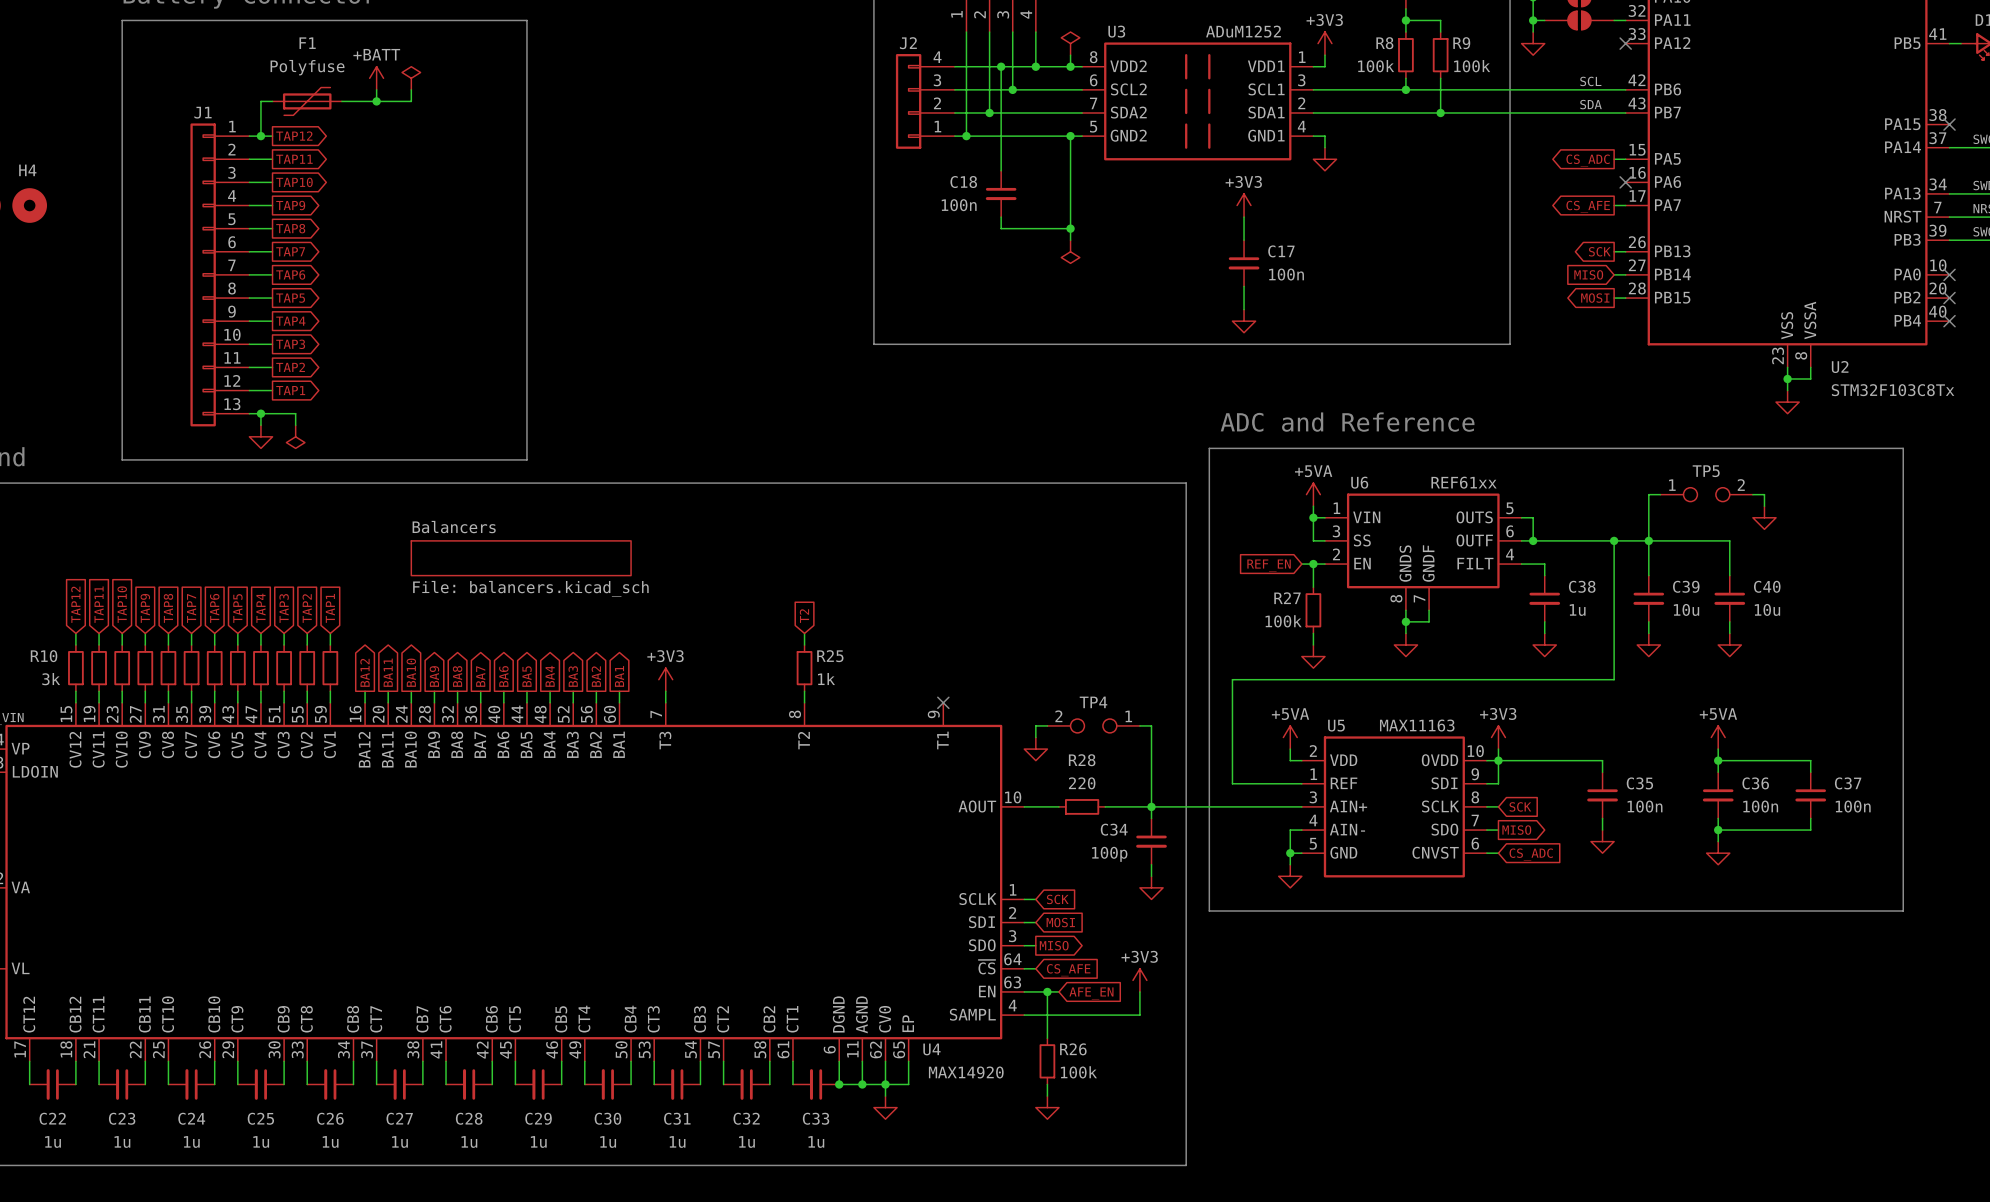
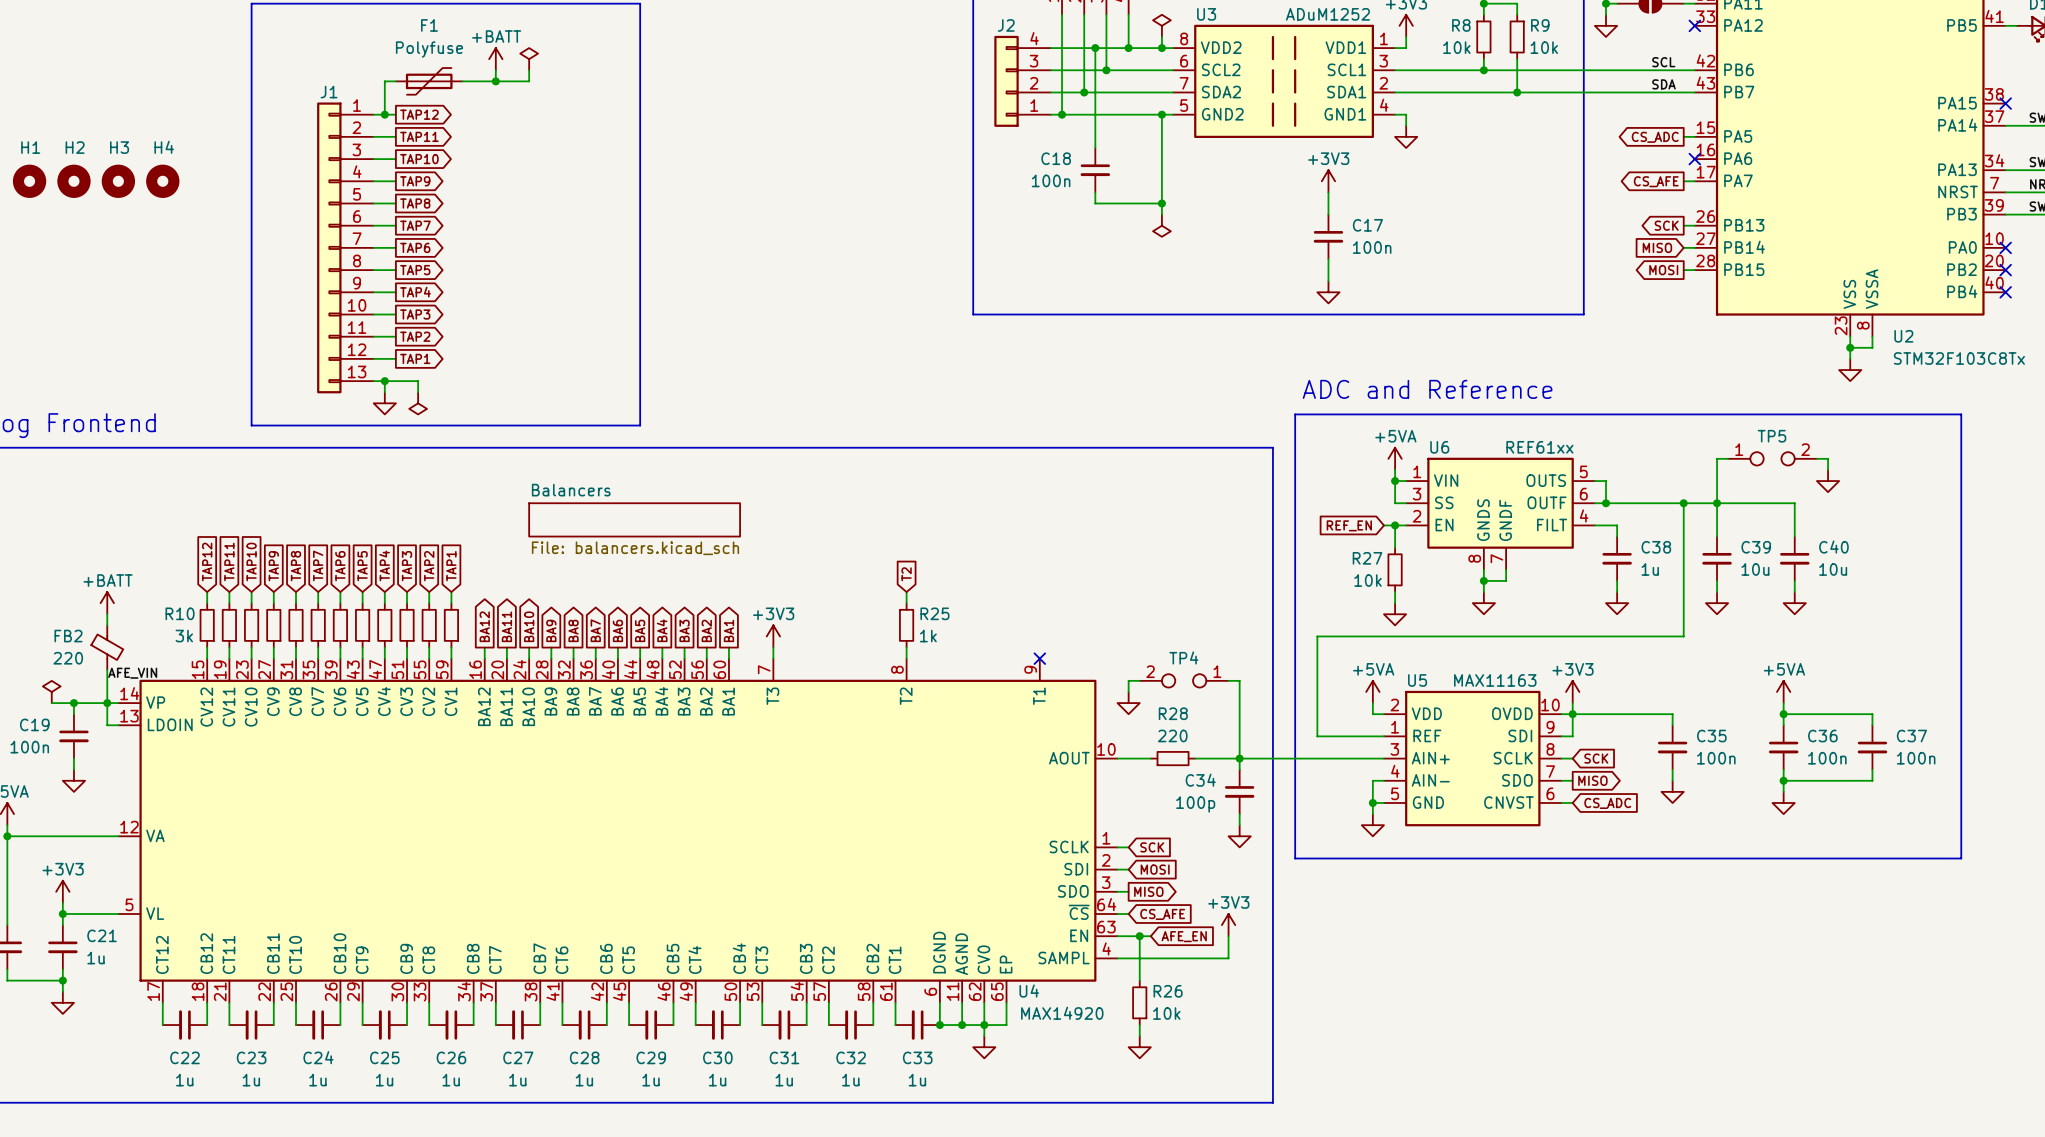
R8 value: 100k (1376, 66) -> 10k (1456, 47)
R9 value: 100k (1472, 66) -> 10k (1544, 47)
R27 value: 100k (1283, 621) -> 10k (1368, 580)
R26 value: 100k (1078, 1072) -> 10k (1166, 1013)

